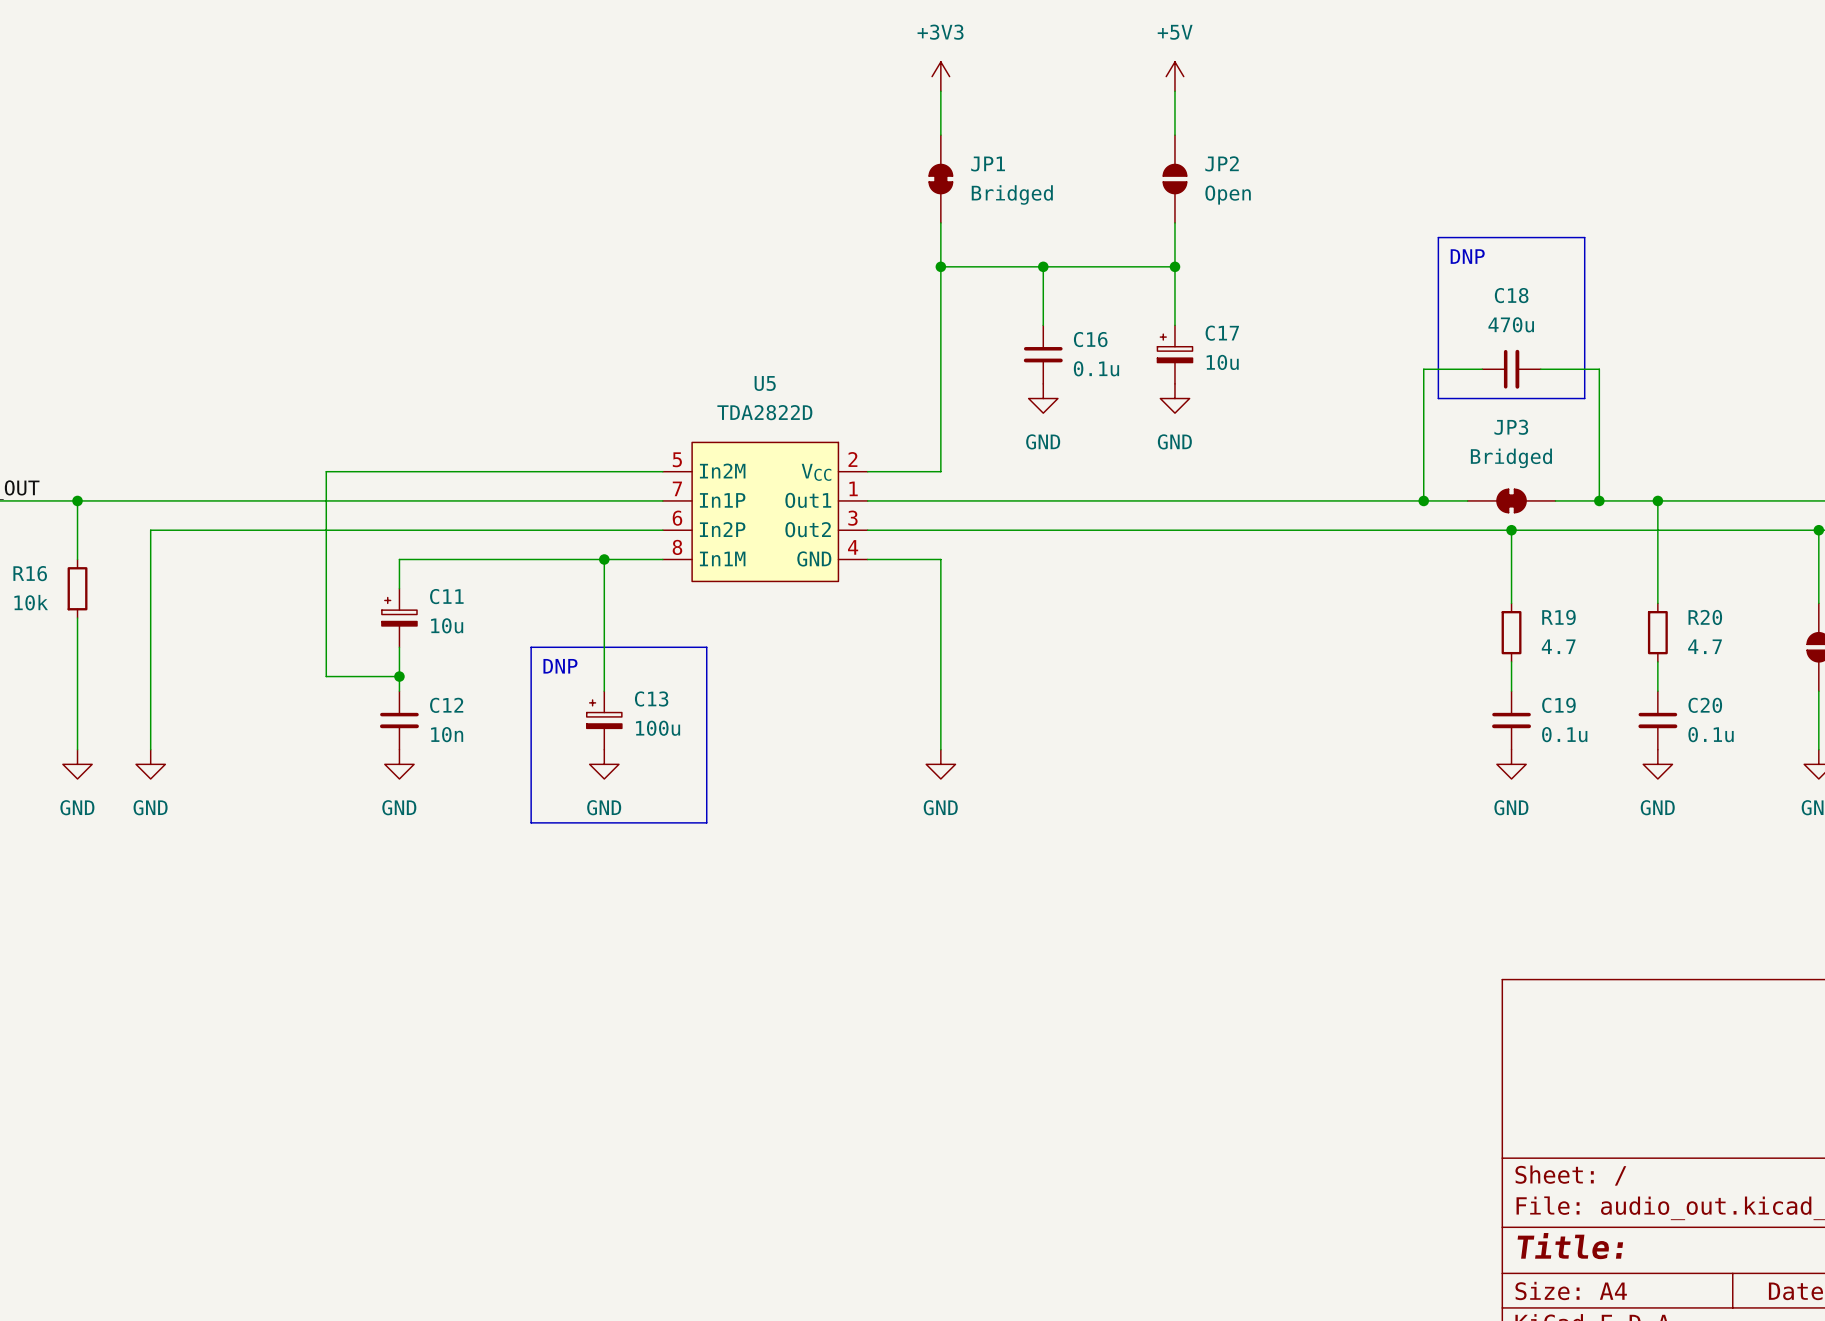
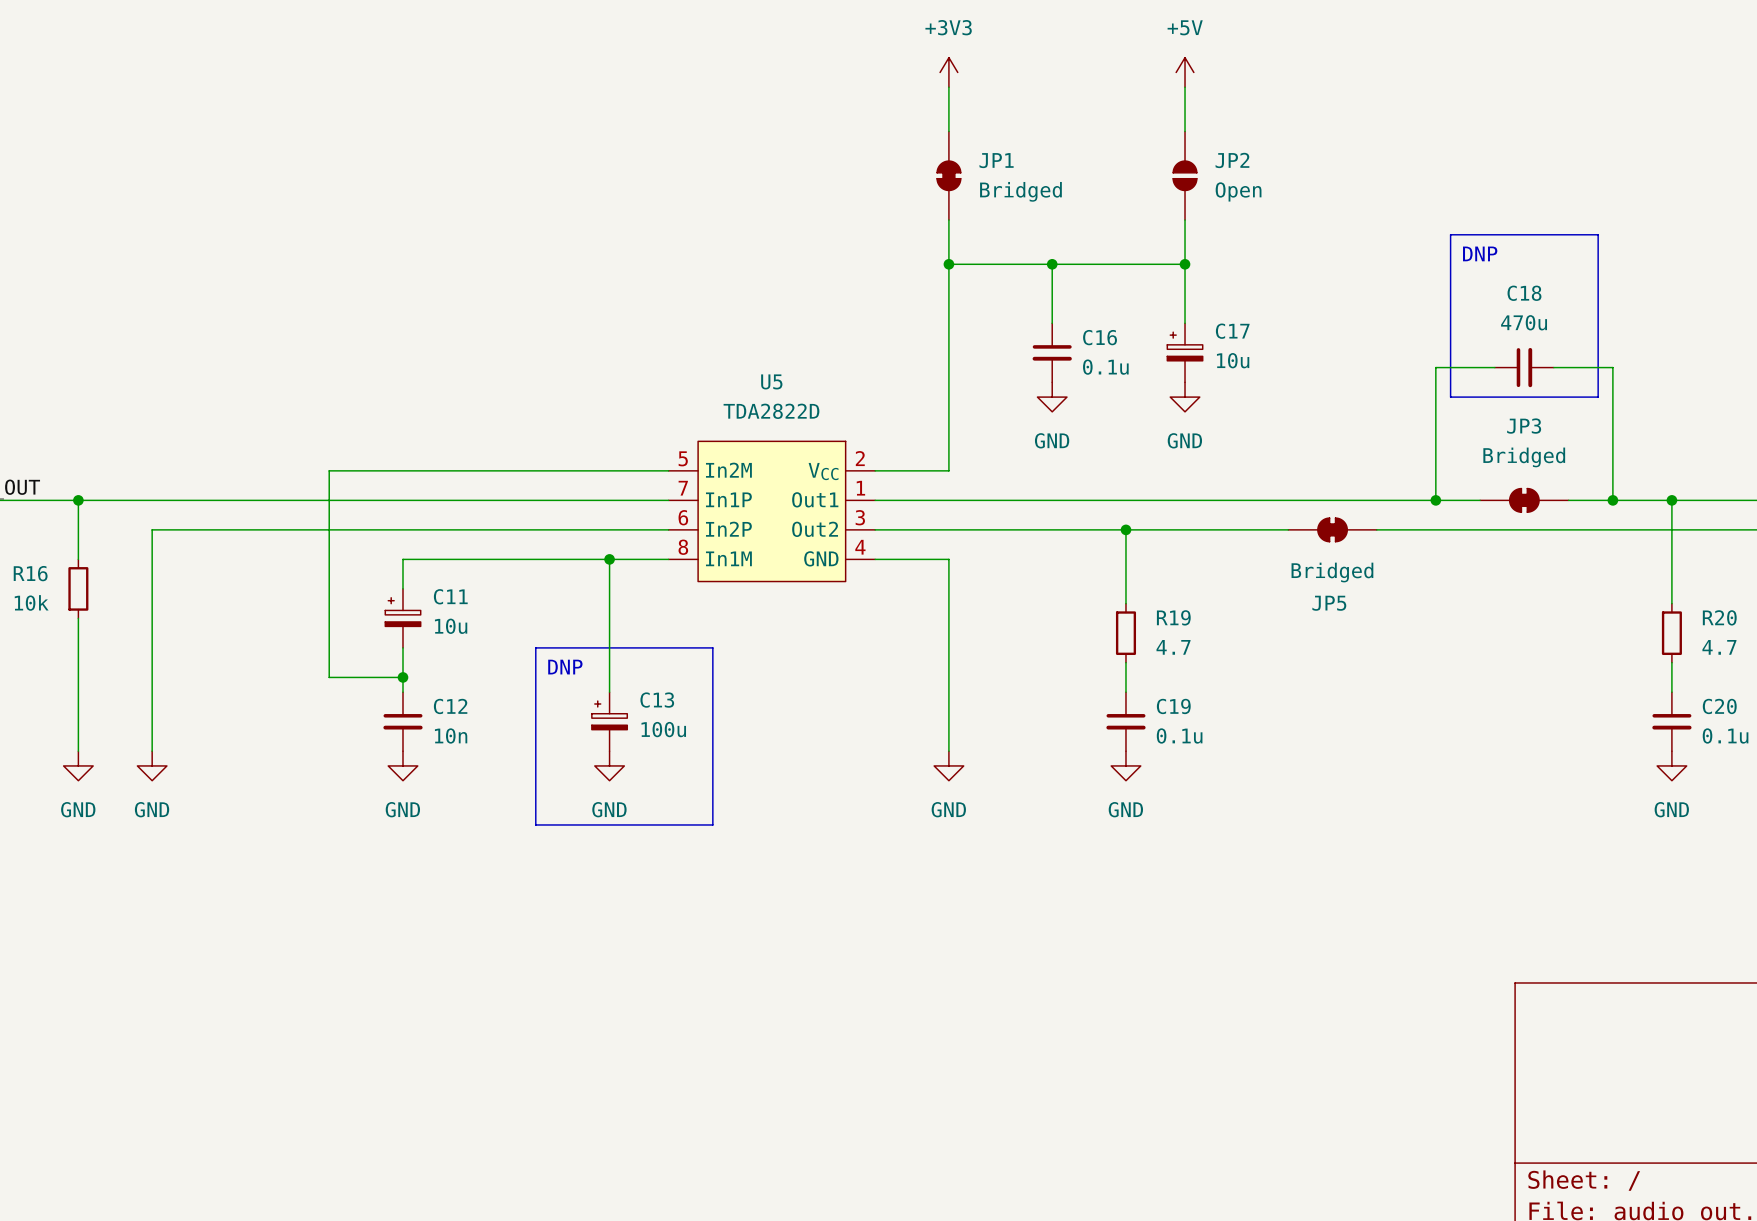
wire: none -> (1125, 529) (1125, 603)
junction: none -> (1125, 529)
JP5: none -> Bridged (1332, 529)
wire: (1511, 530) (1511, 603) -> none
junction: (1511, 530) -> none
R19 position: (1511, 632) -> (1125, 633)
wire: none -> (1125, 662) (1125, 692)
wire: (1511, 661) (1511, 691) -> none
C19 position: (1511, 720) -> (1125, 721)
power symbol: none -> GND (1125, 765)
power symbol: GND (1511, 764) -> none

